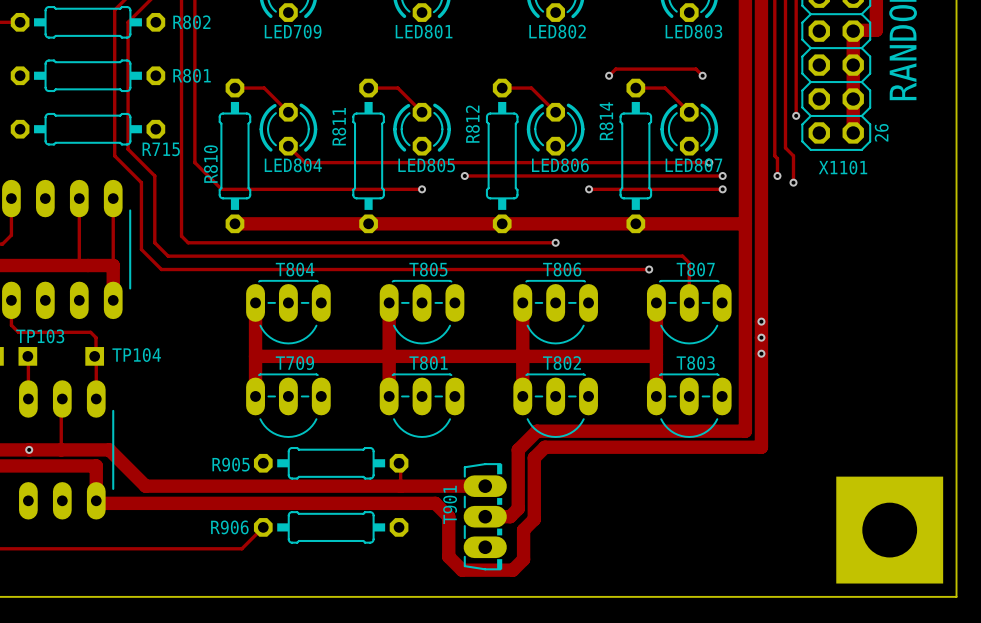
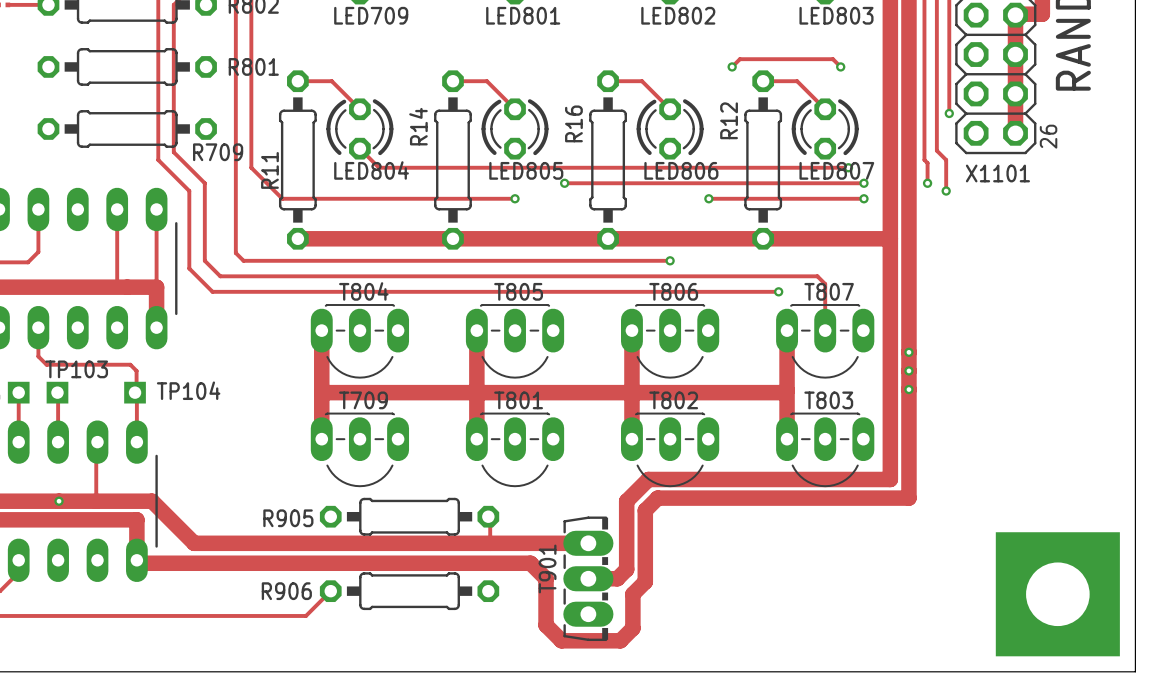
R814 name: R814 (606, 121) -> R12 (729, 120)
R812 name: R812 (472, 124) -> R16 (573, 123)
R811 name: R811 (339, 126) -> R14 (418, 126)
R715 name: R715 (161, 149) -> R709 (218, 152)
R810 name: R810 (210, 164) -> R11 (269, 170)

